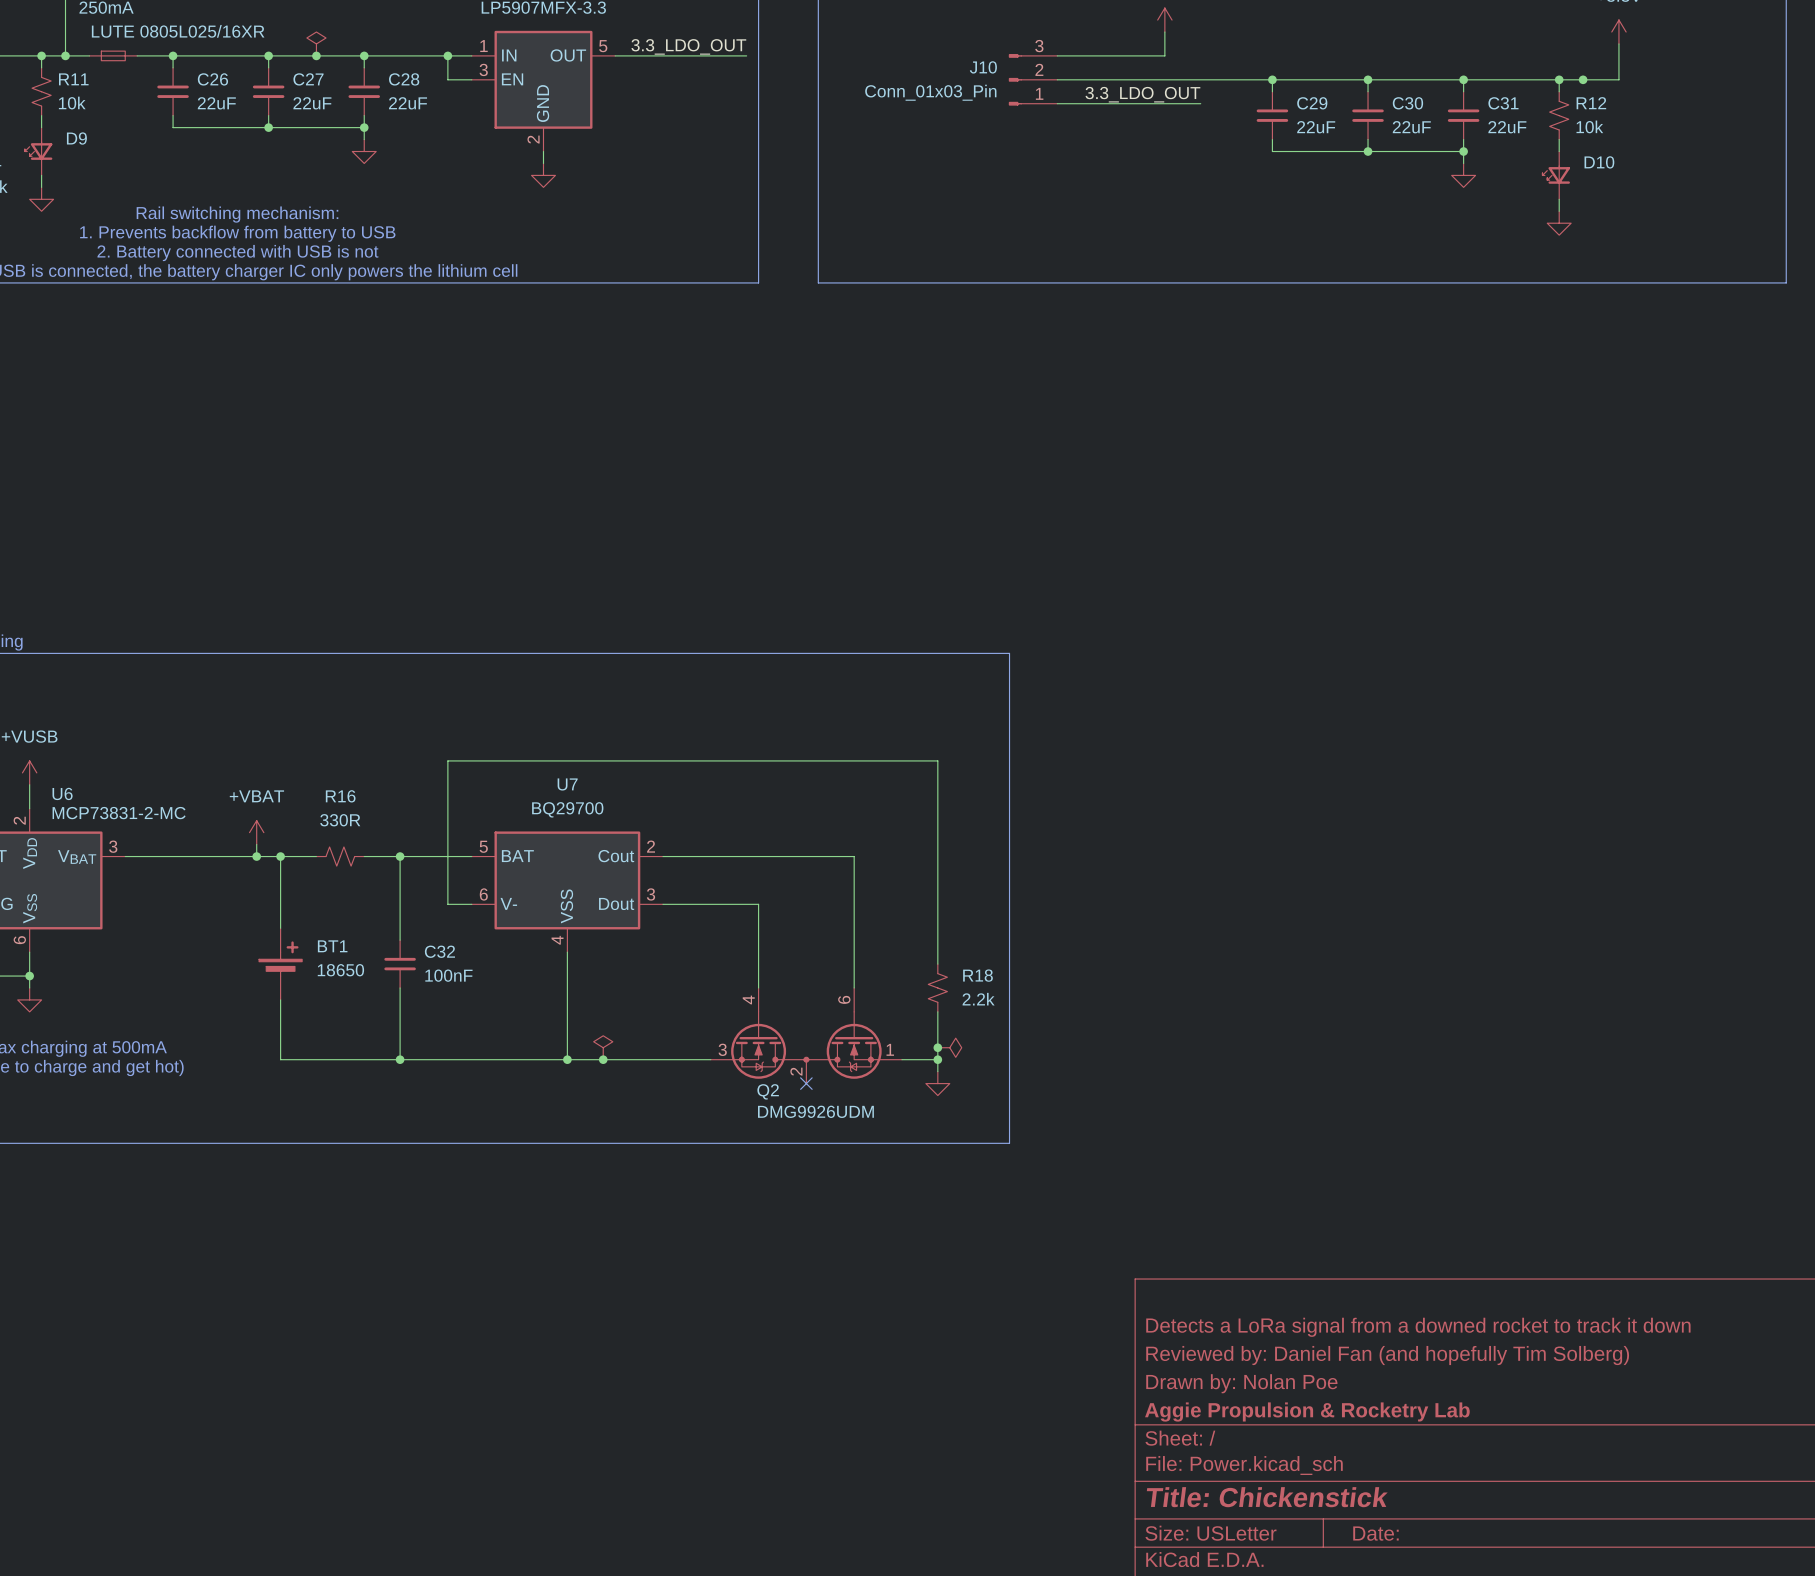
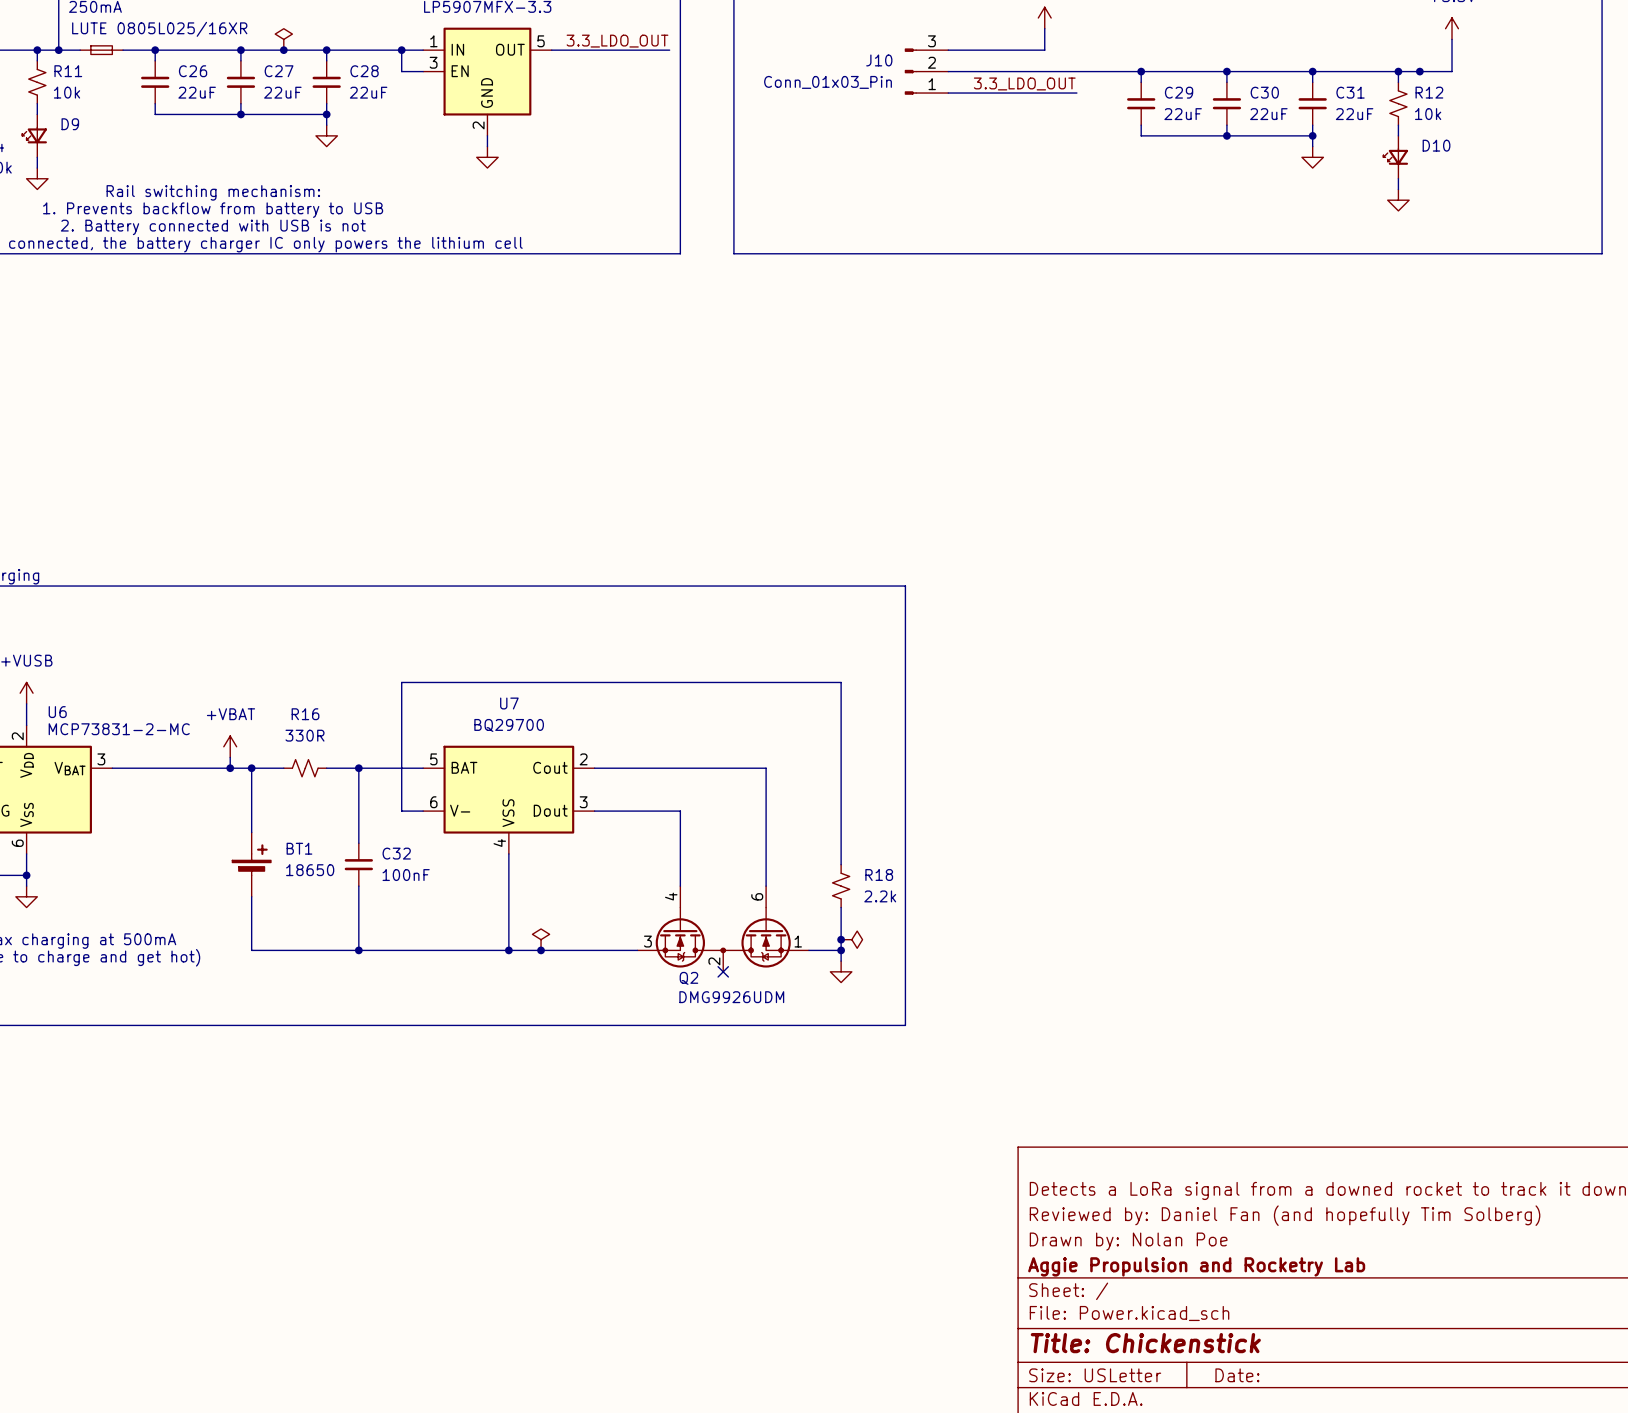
title block: Aggie Propulsion & Rocketry Lab (1307, 1412) -> Aggie Propulsion and Rocketry Lab (1196, 1266)

